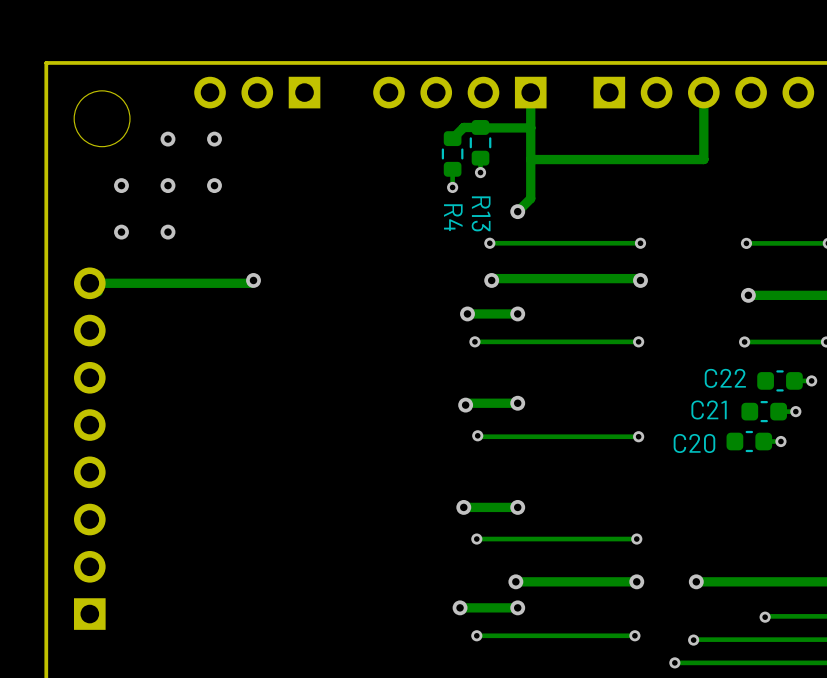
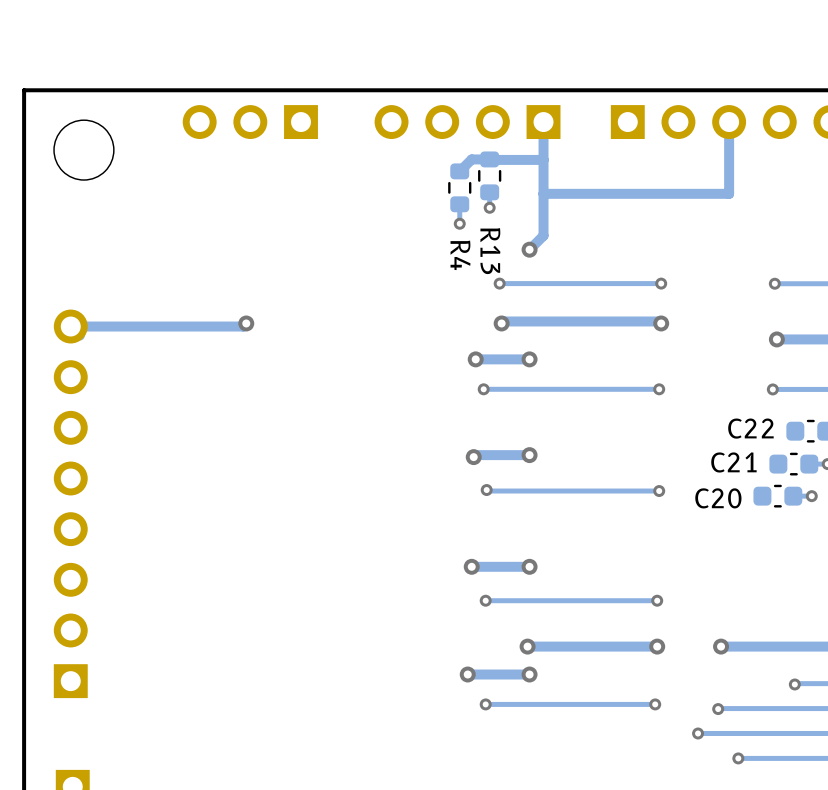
via: (167, 139) -> none
via: (214, 139) -> none
via: (121, 185) -> none
via: (167, 185) -> none
via: (214, 185) -> none
via: (121, 232) -> none
via: (167, 232) -> none

